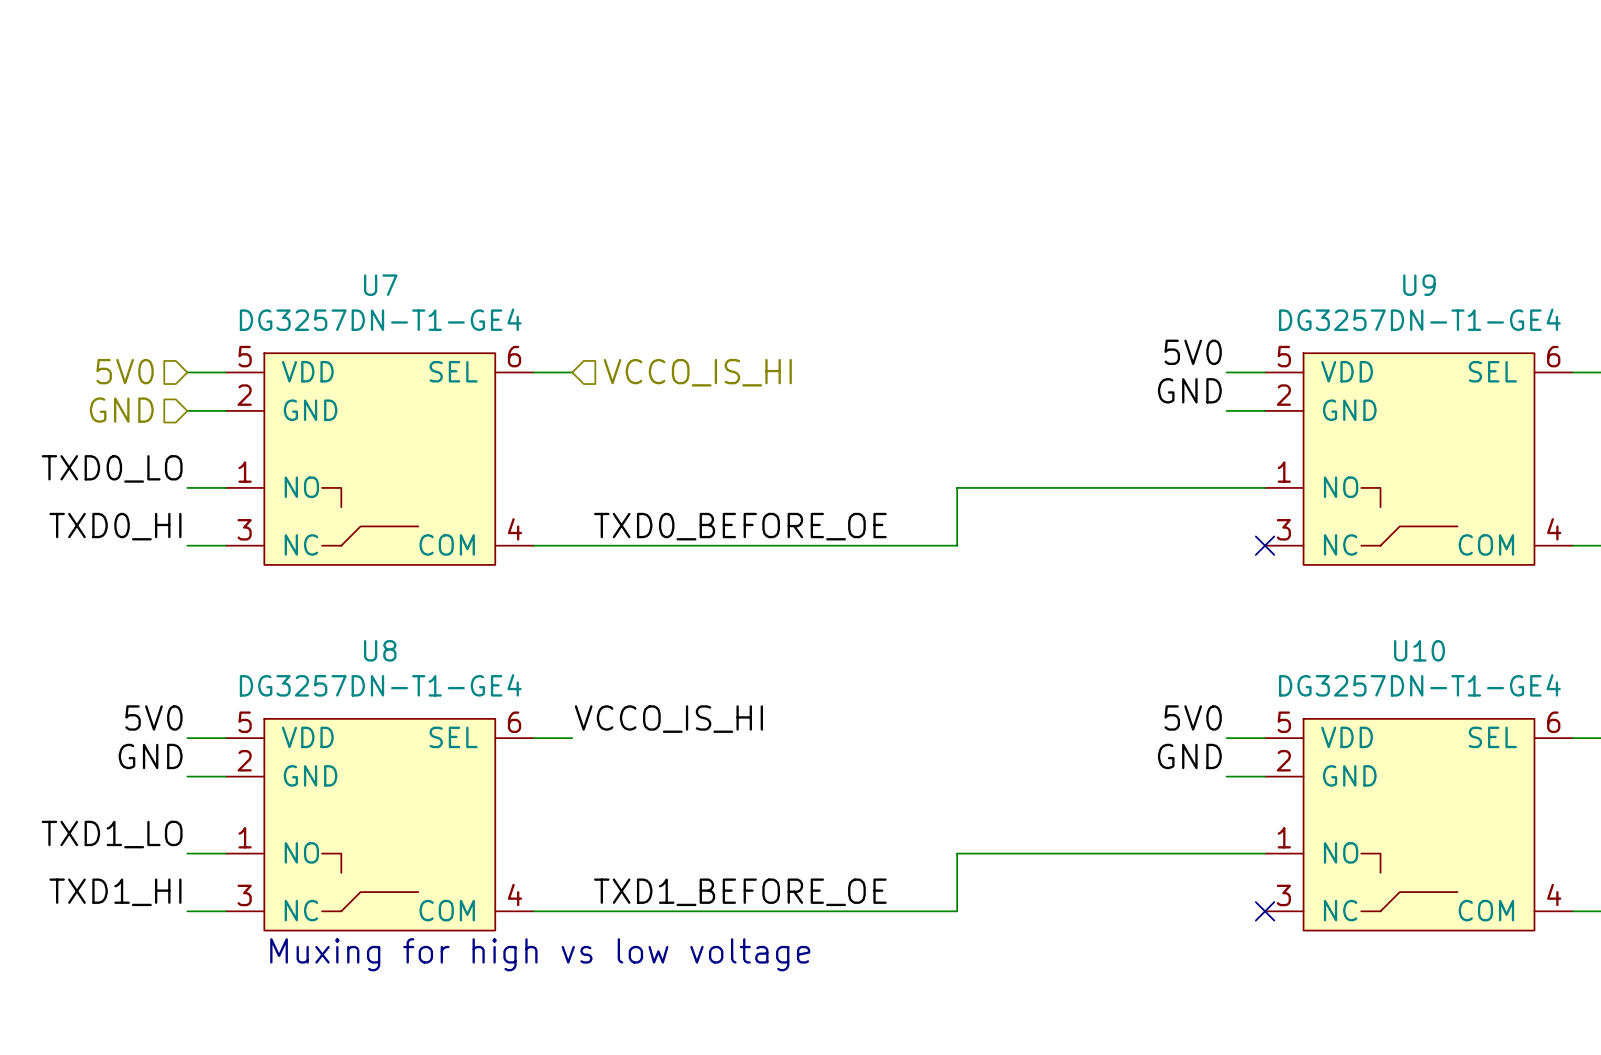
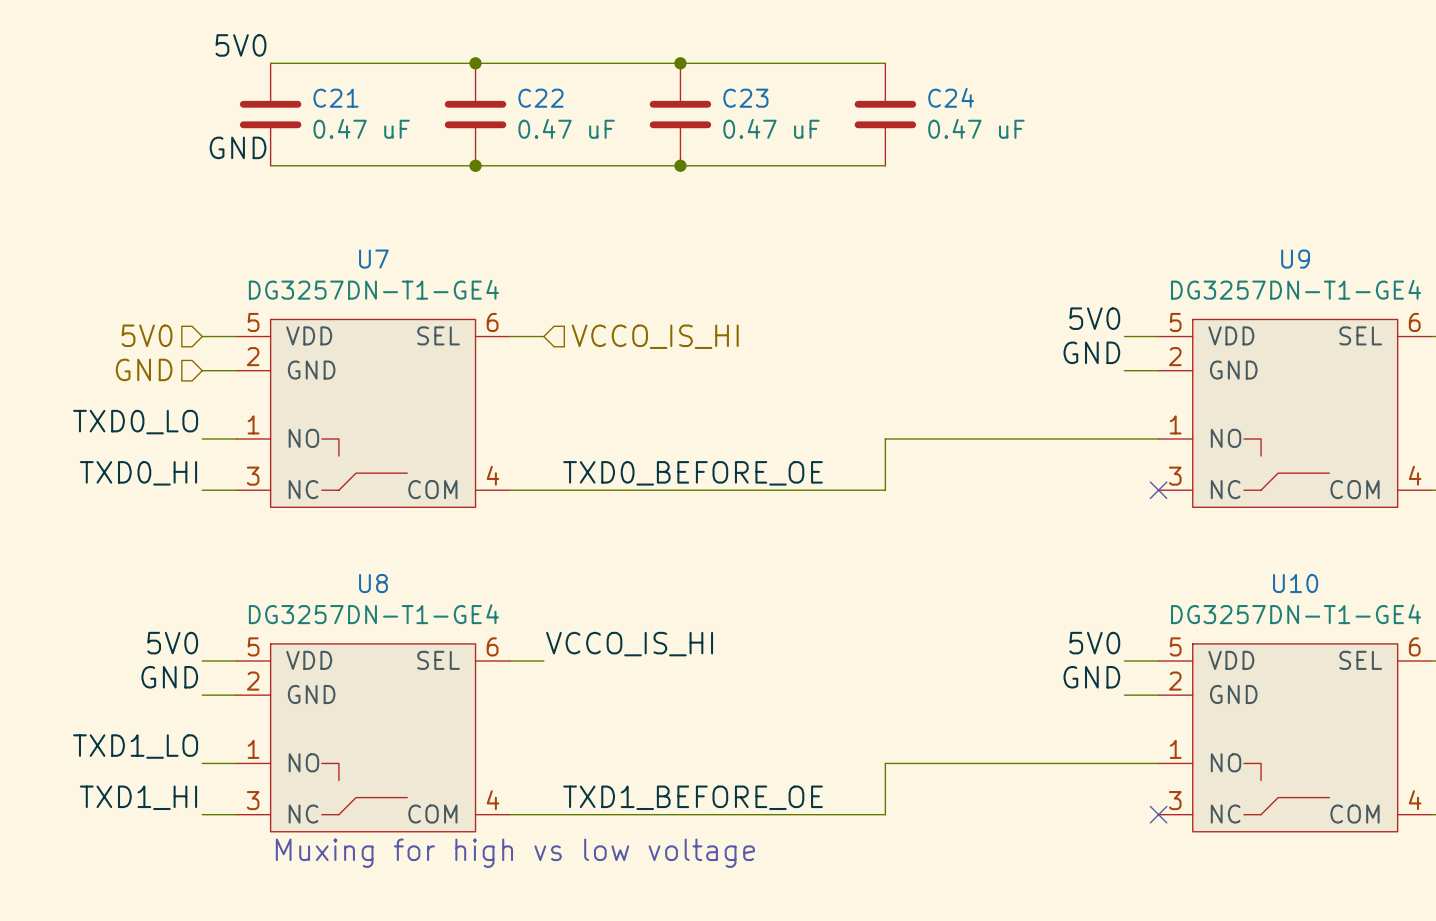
label: none -> 5V0 (240, 45)
wire: none -> (270, 63) (885, 63)
junction: none -> (475, 63)
junction: none -> (680, 63)
C21: none -> 0.47 uF (270, 114)
C22: none -> 0.47 uF (475, 114)
C23: none -> 0.47 uF (680, 114)
C24: none -> 0.47 uF (885, 114)
label: none -> GND (238, 147)
wire: none -> (270, 165) (885, 165)
junction: none -> (475, 165)
junction: none -> (680, 165)

